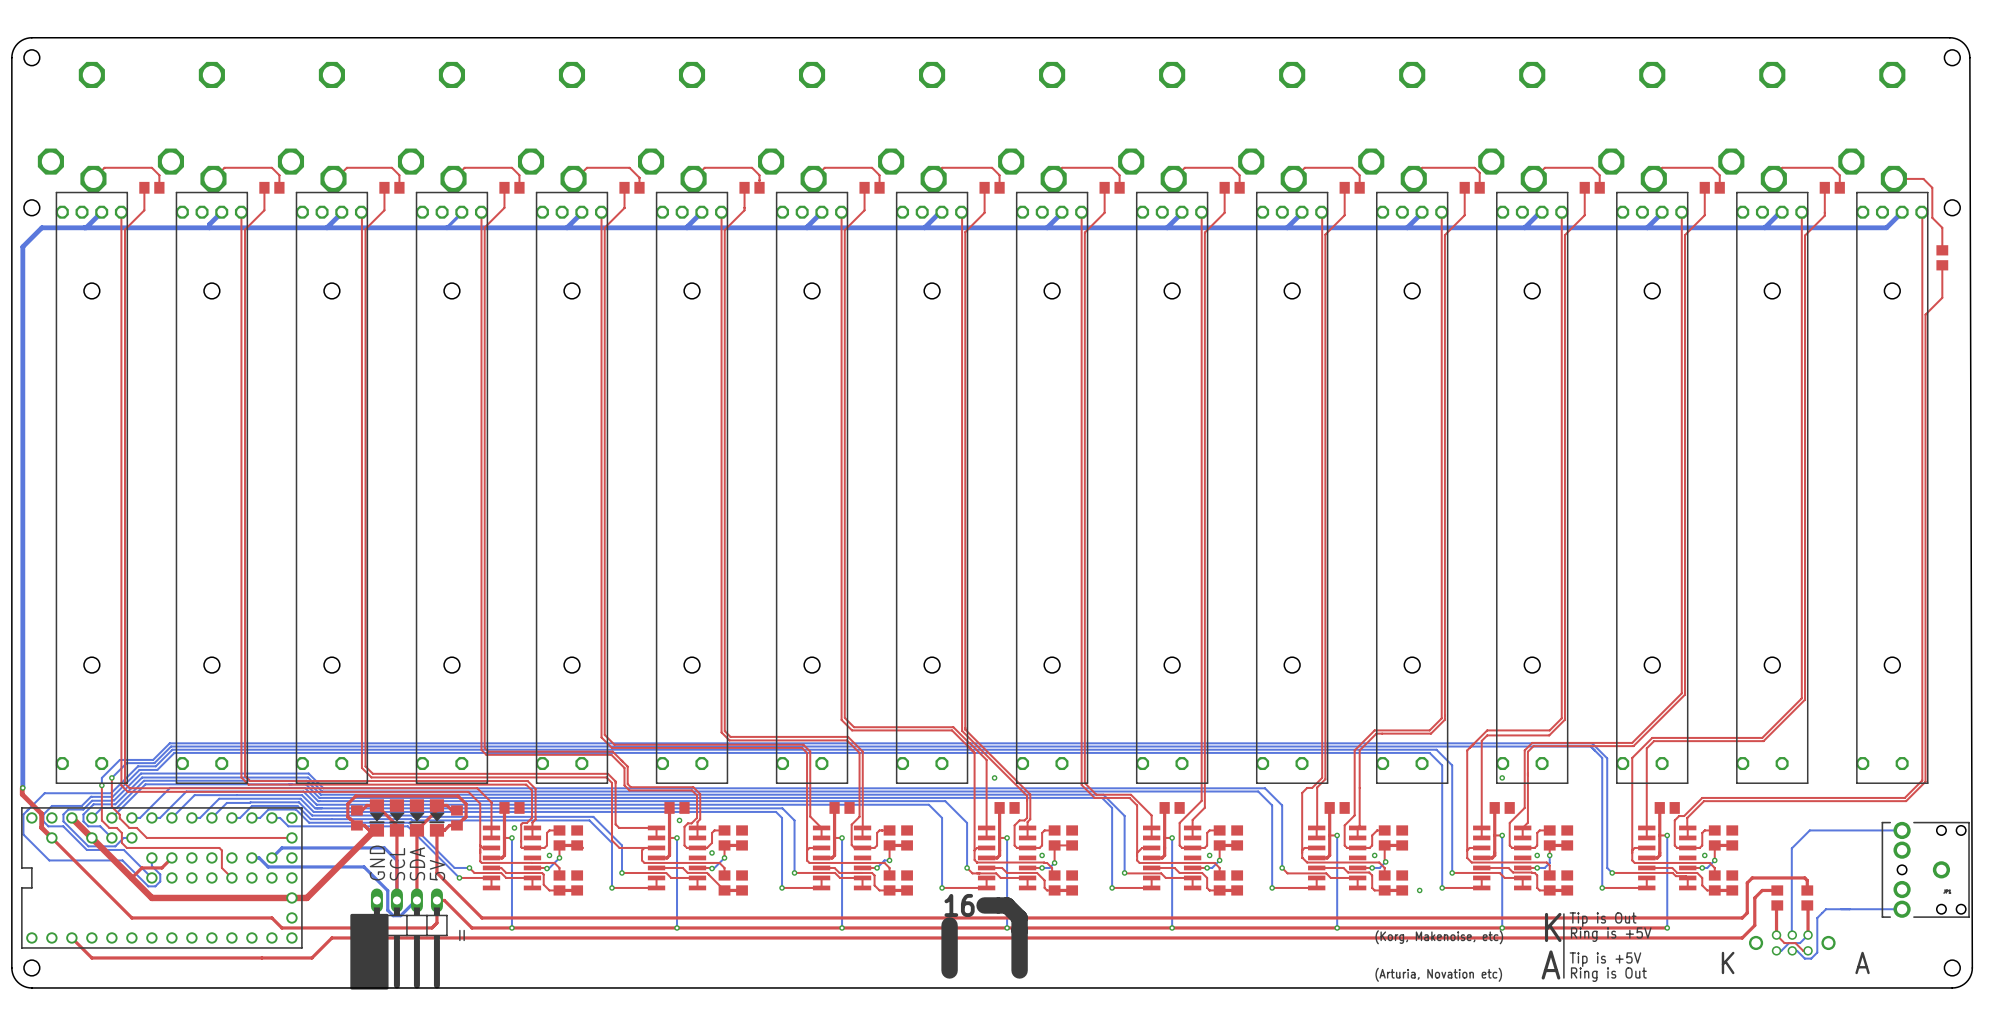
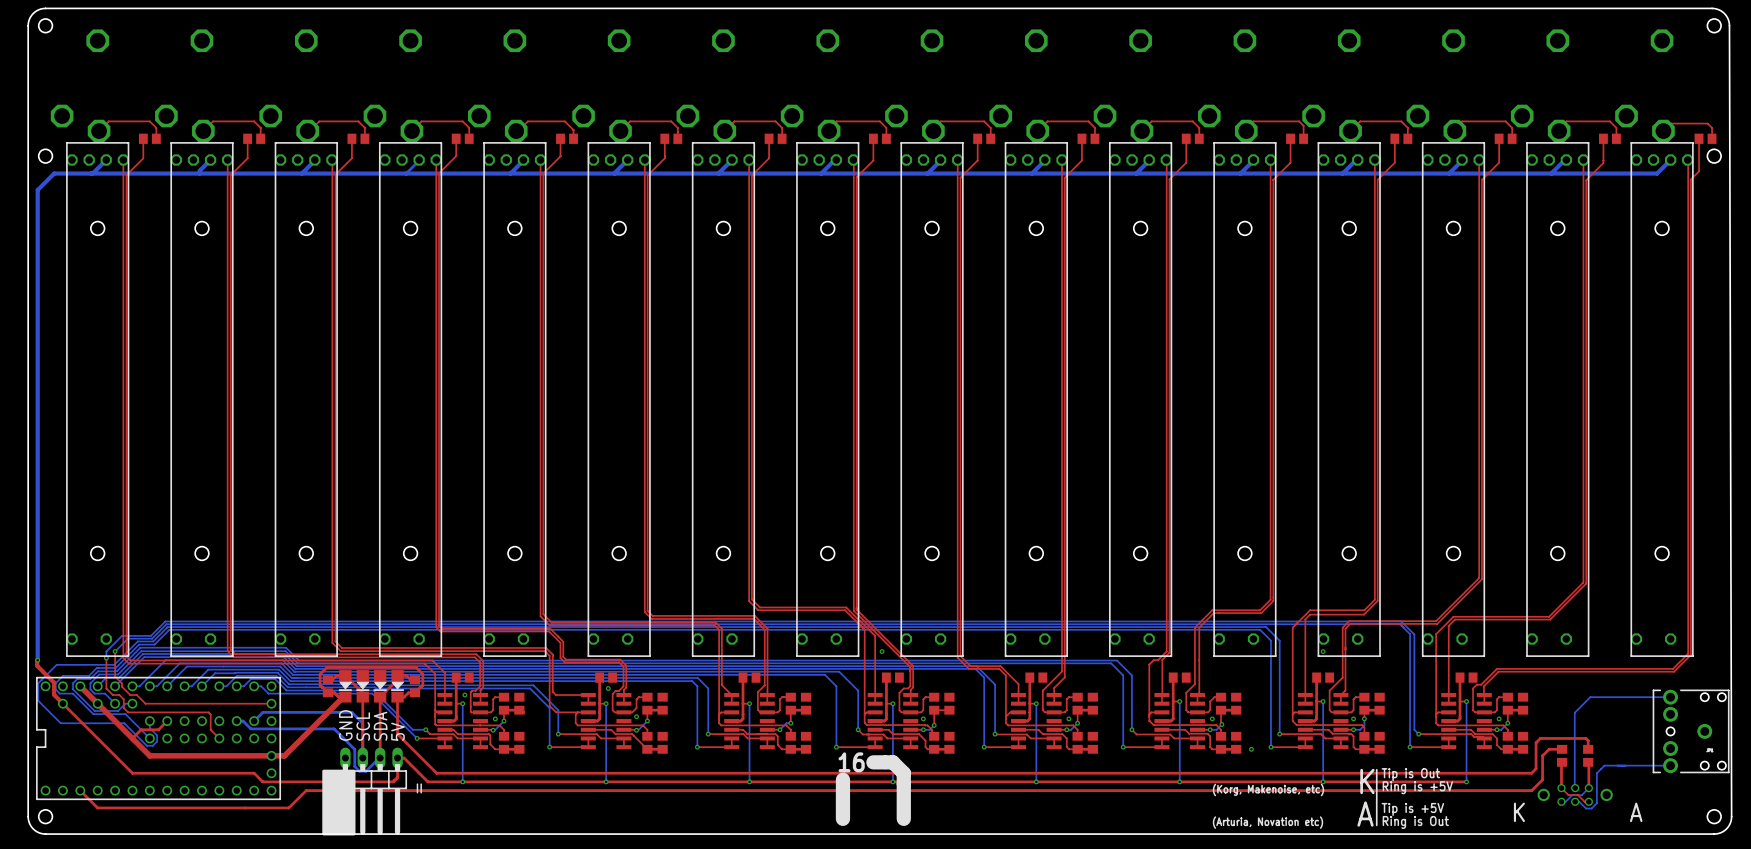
top track: (1893, 178) (1923, 178) (1932, 187) (1932, 217) (1942, 227) (1942, 250) -> (1663, 131) (1670, 123) (1707, 123) (1712, 127) (1712, 138)
part rotation: 0° (1942, 257) -> 90° clockwise (1705, 138)
part position: (1942, 257) -> (1705, 138)
top track: (1942, 265) (1942, 297) (1925, 314) -> (1699, 138) (1699, 171) (1690, 179) (1690, 248)

